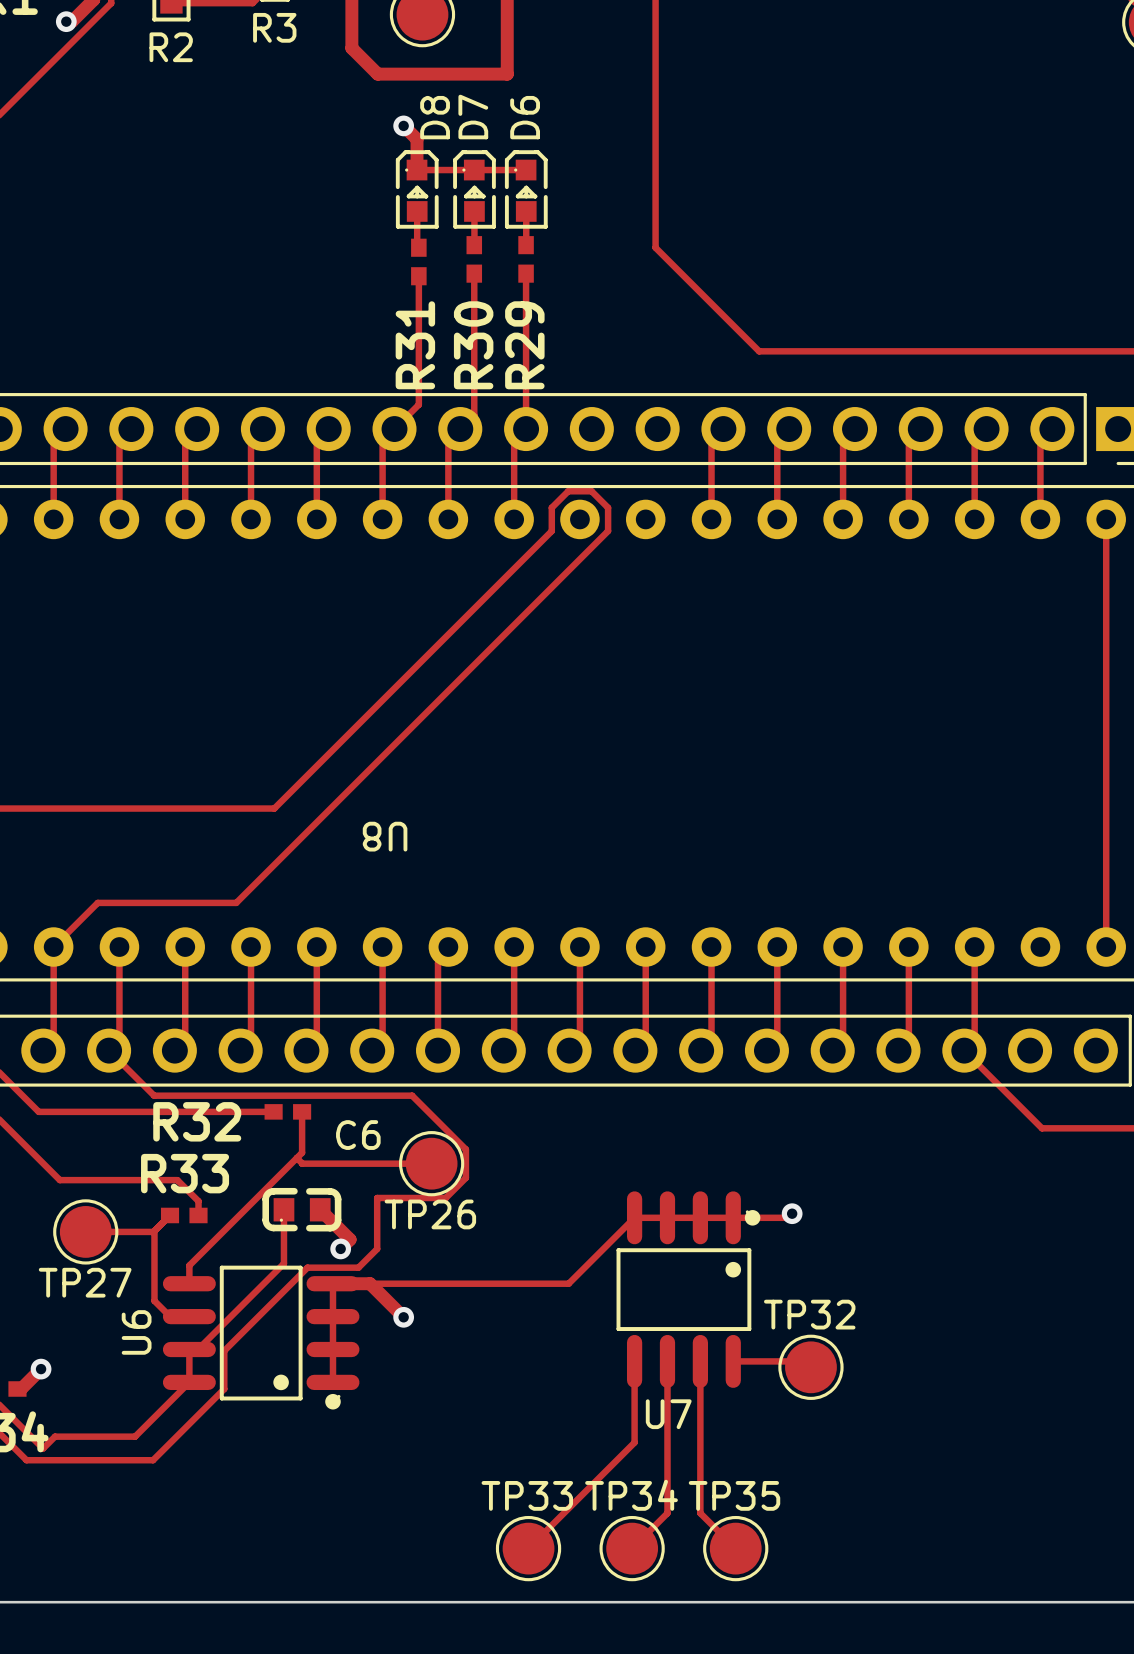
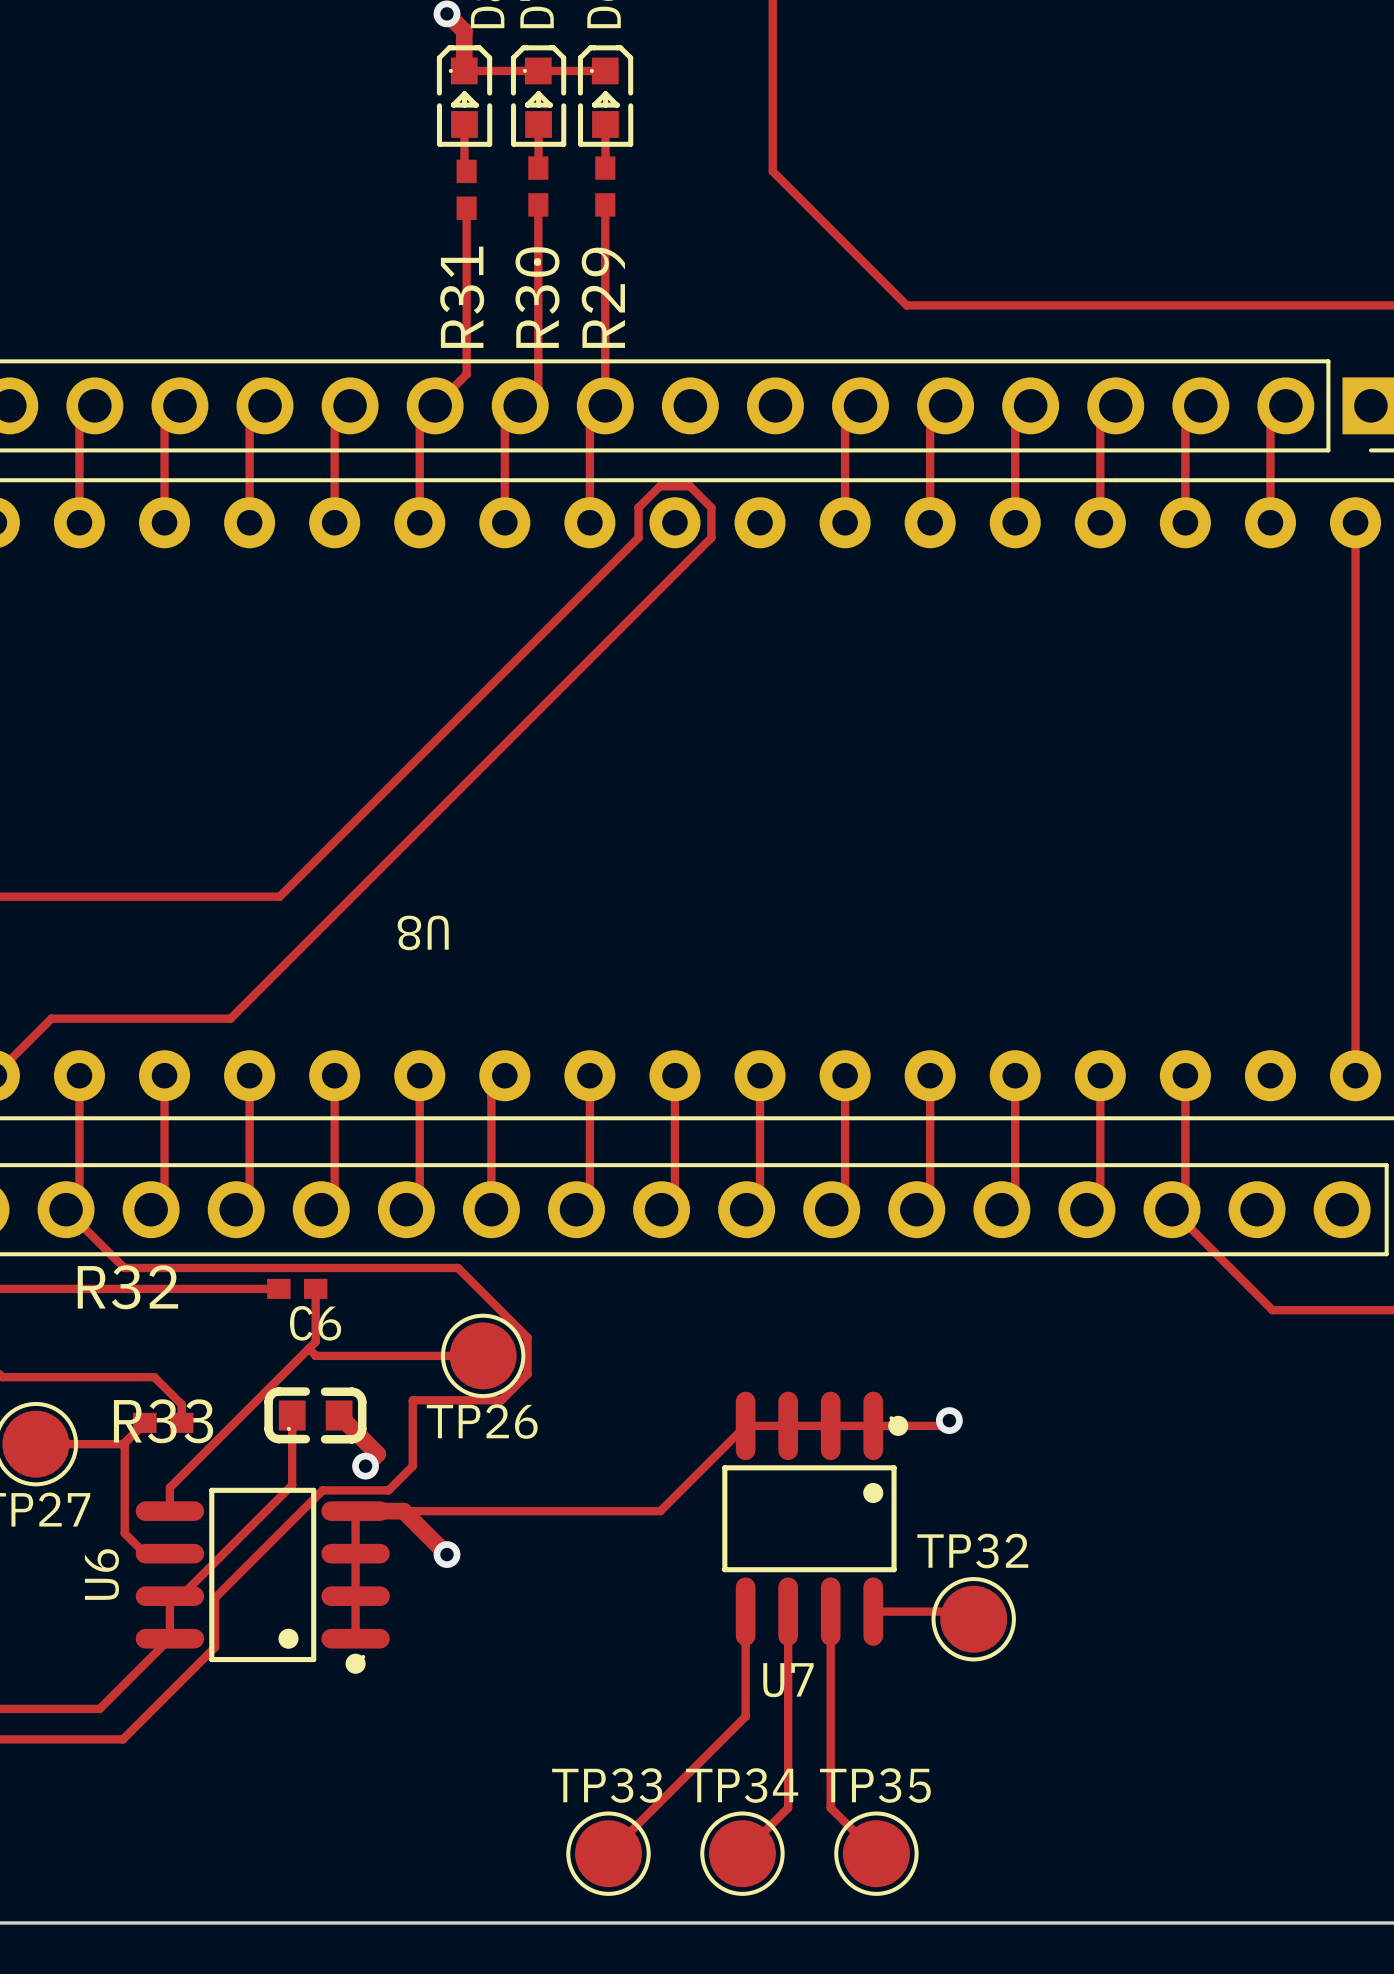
R32 name position: R32 (197, 1121) -> R32 (127, 1287)
C6 name position: C6 (358, 1135) -> C6 (315, 1323)
R33 name position: R33 (185, 1173) -> R33 (163, 1421)

